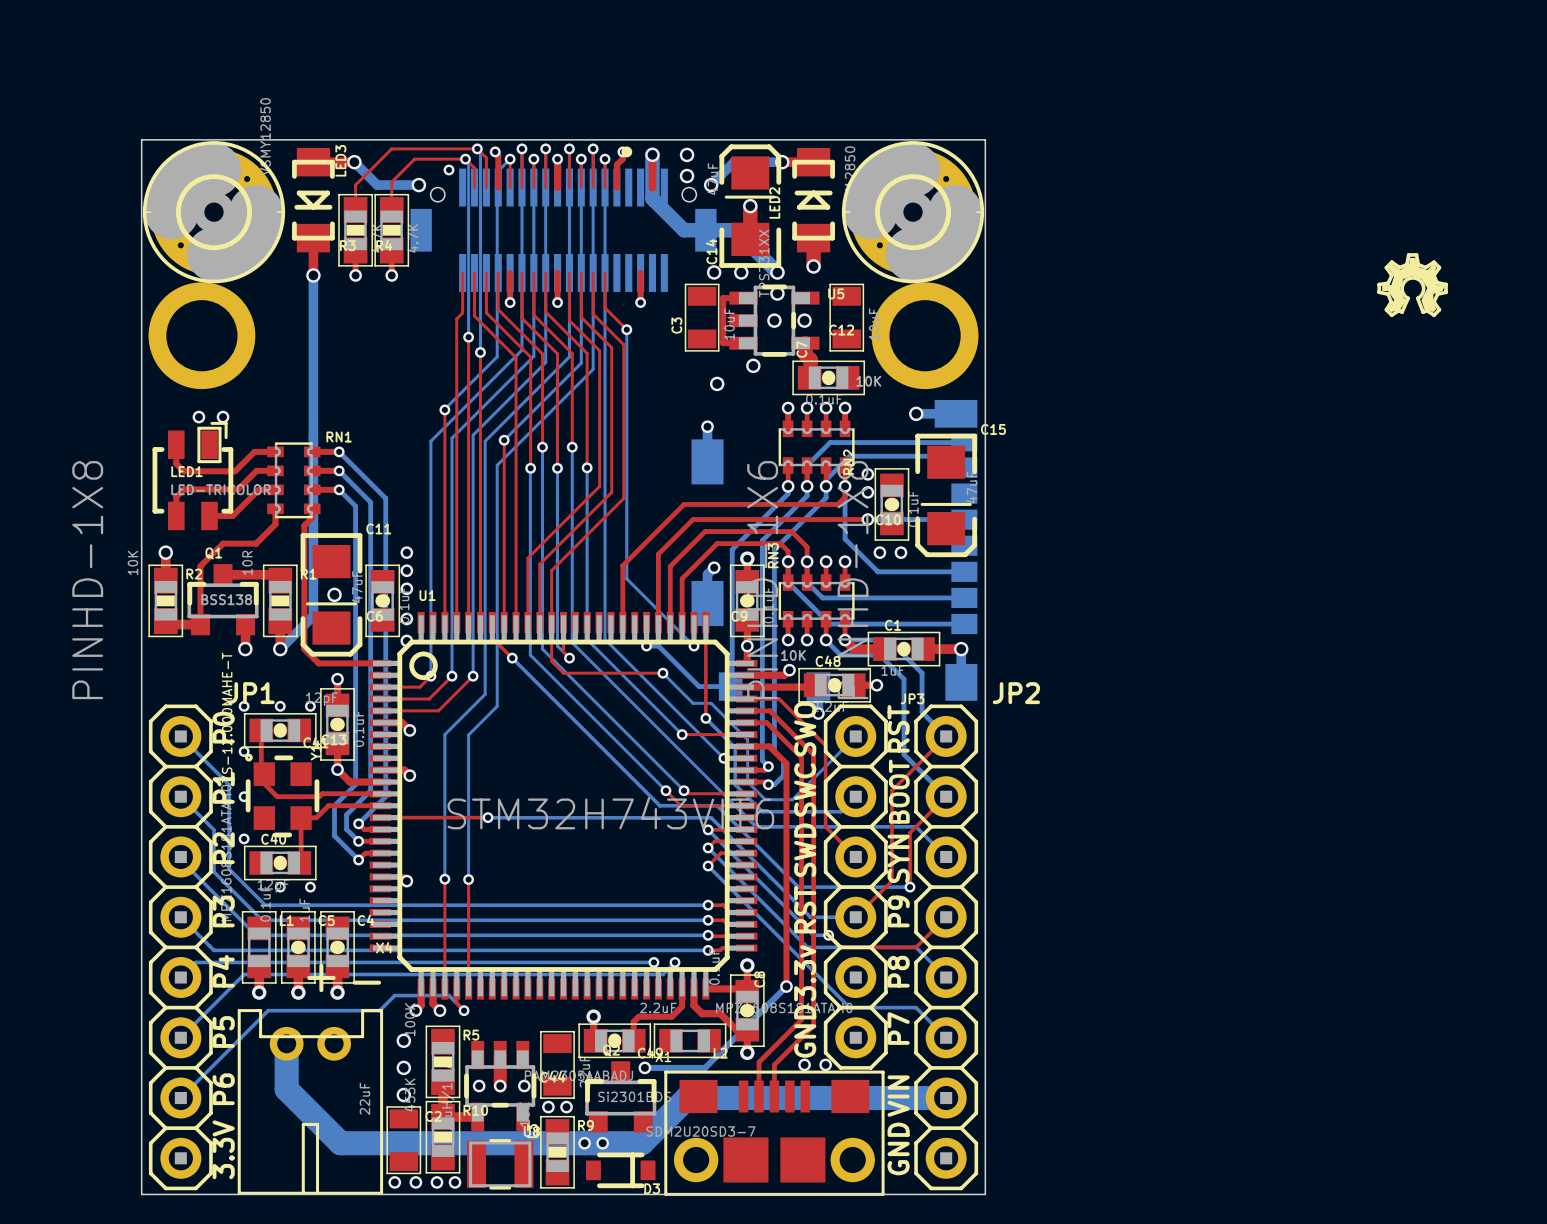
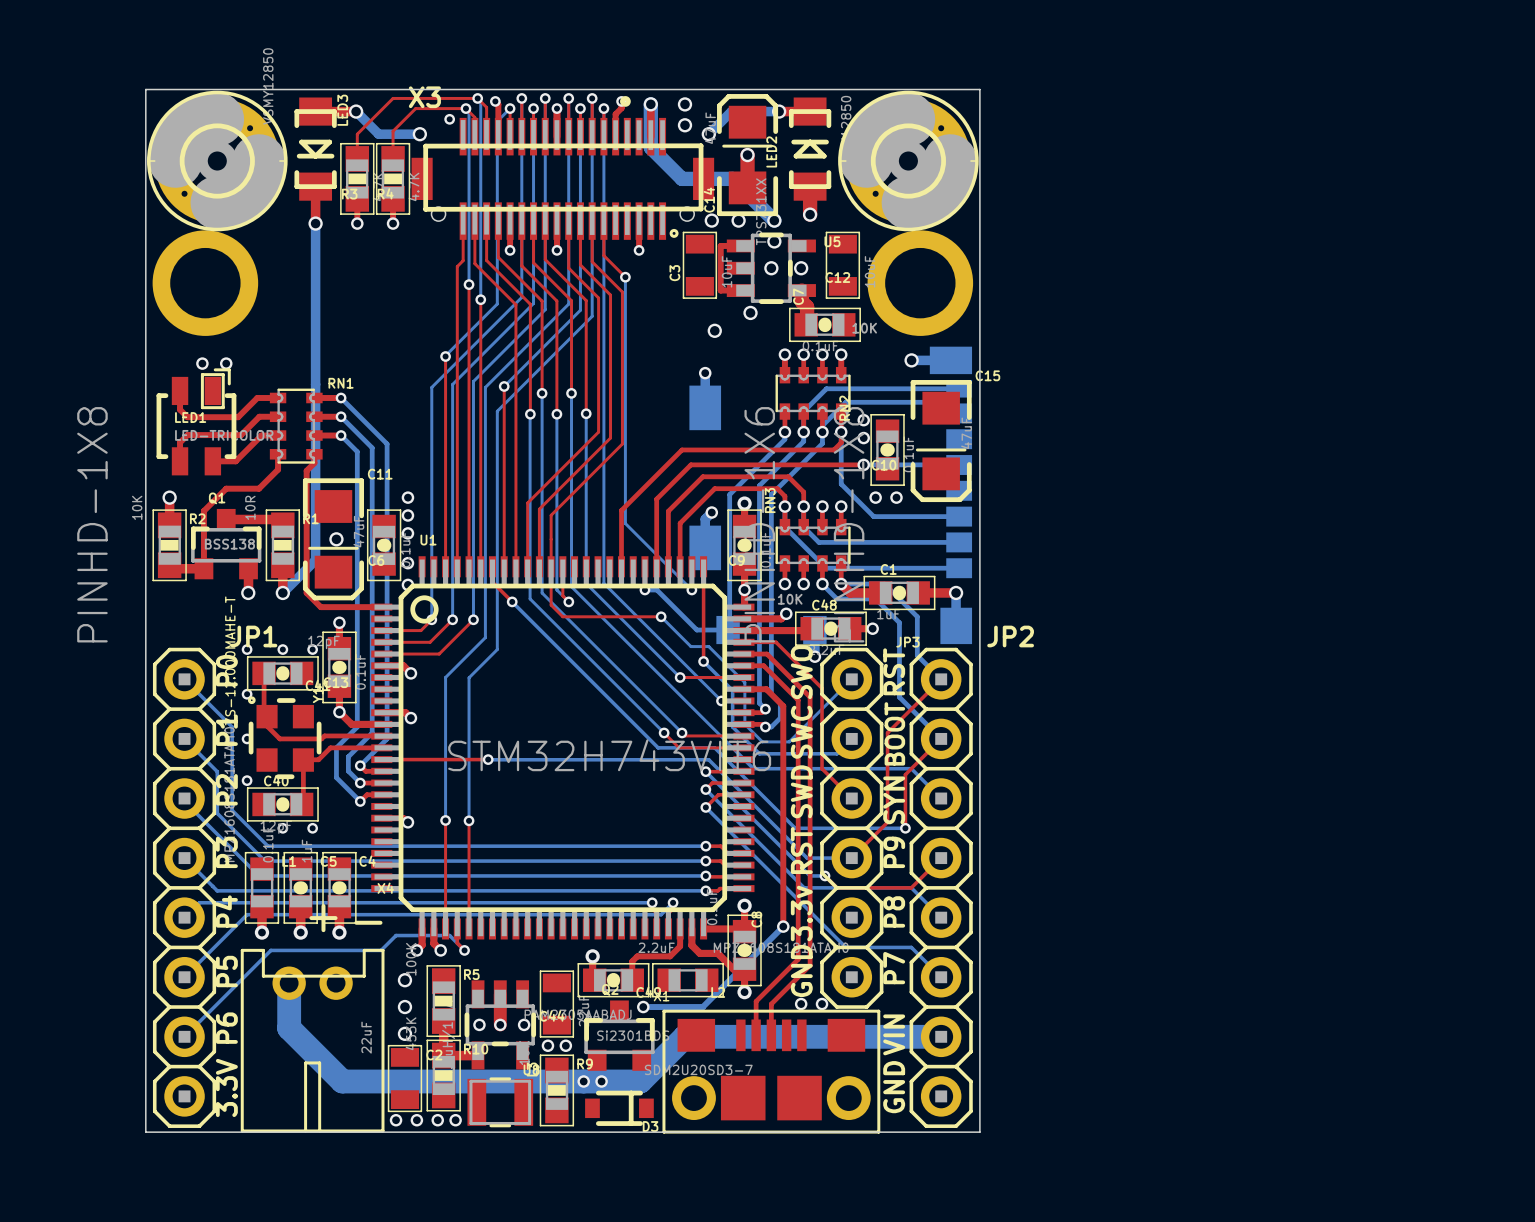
X3 side: bottom (563, 230) -> top (562, 178)
drawing: [1377, 253, 1448, 318] -> none

